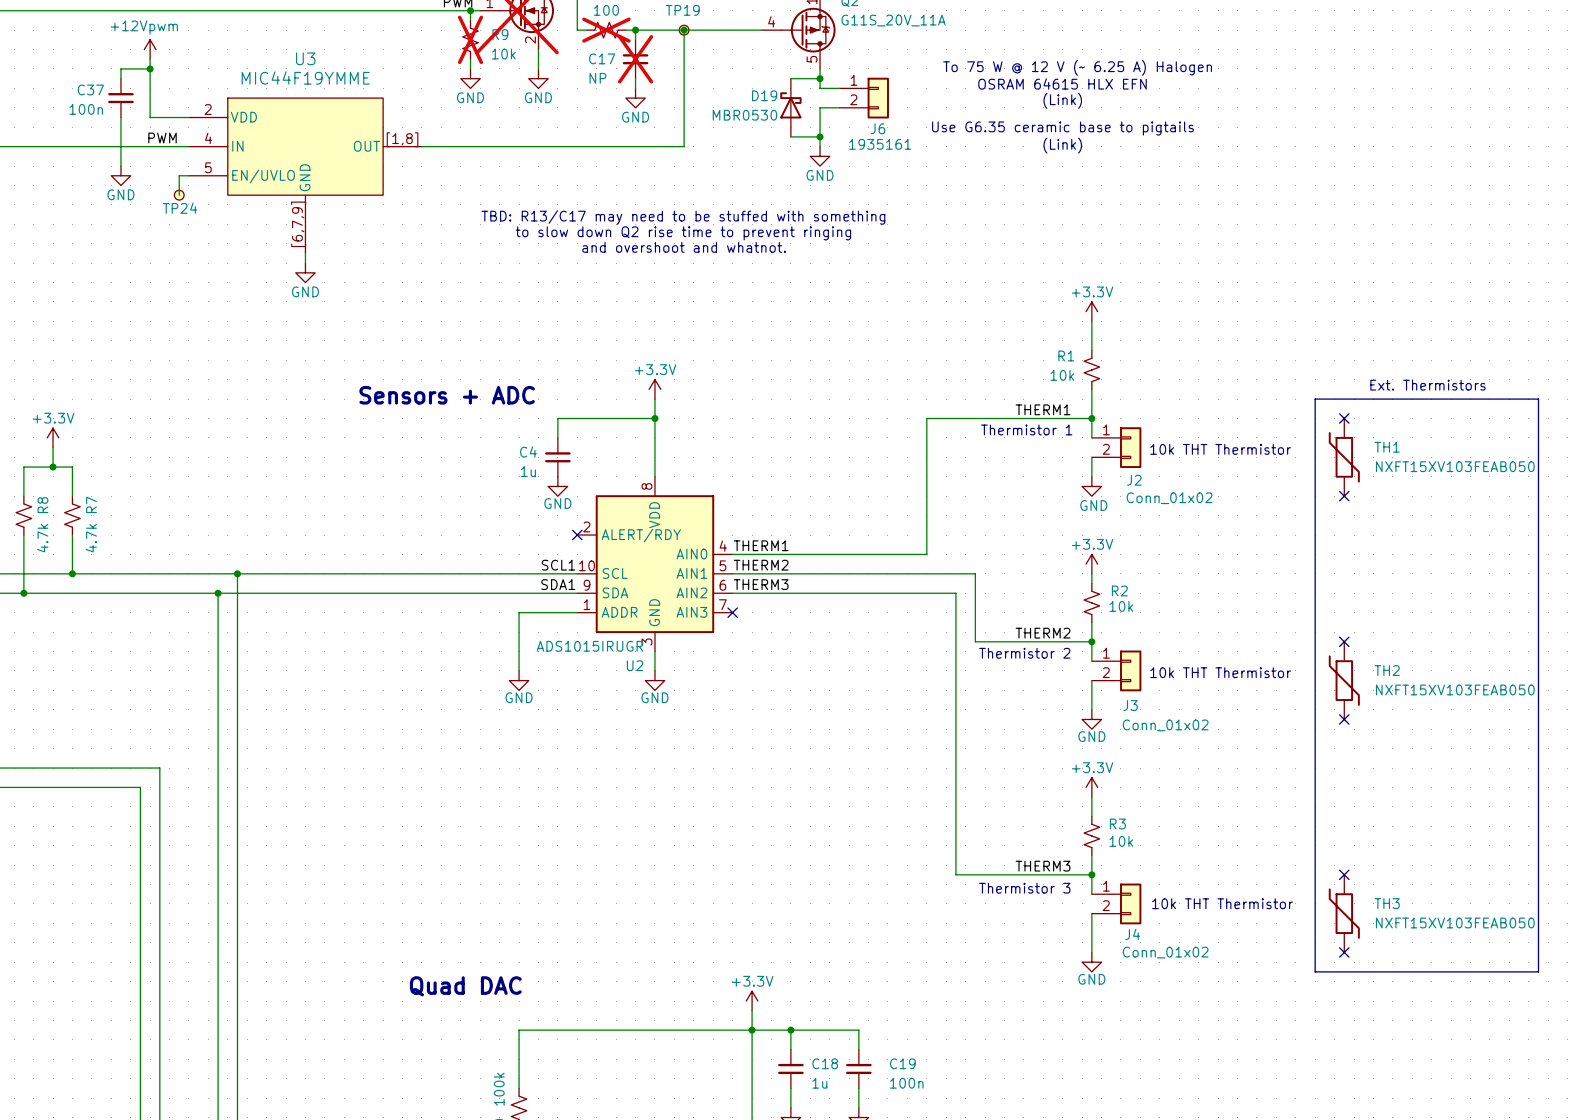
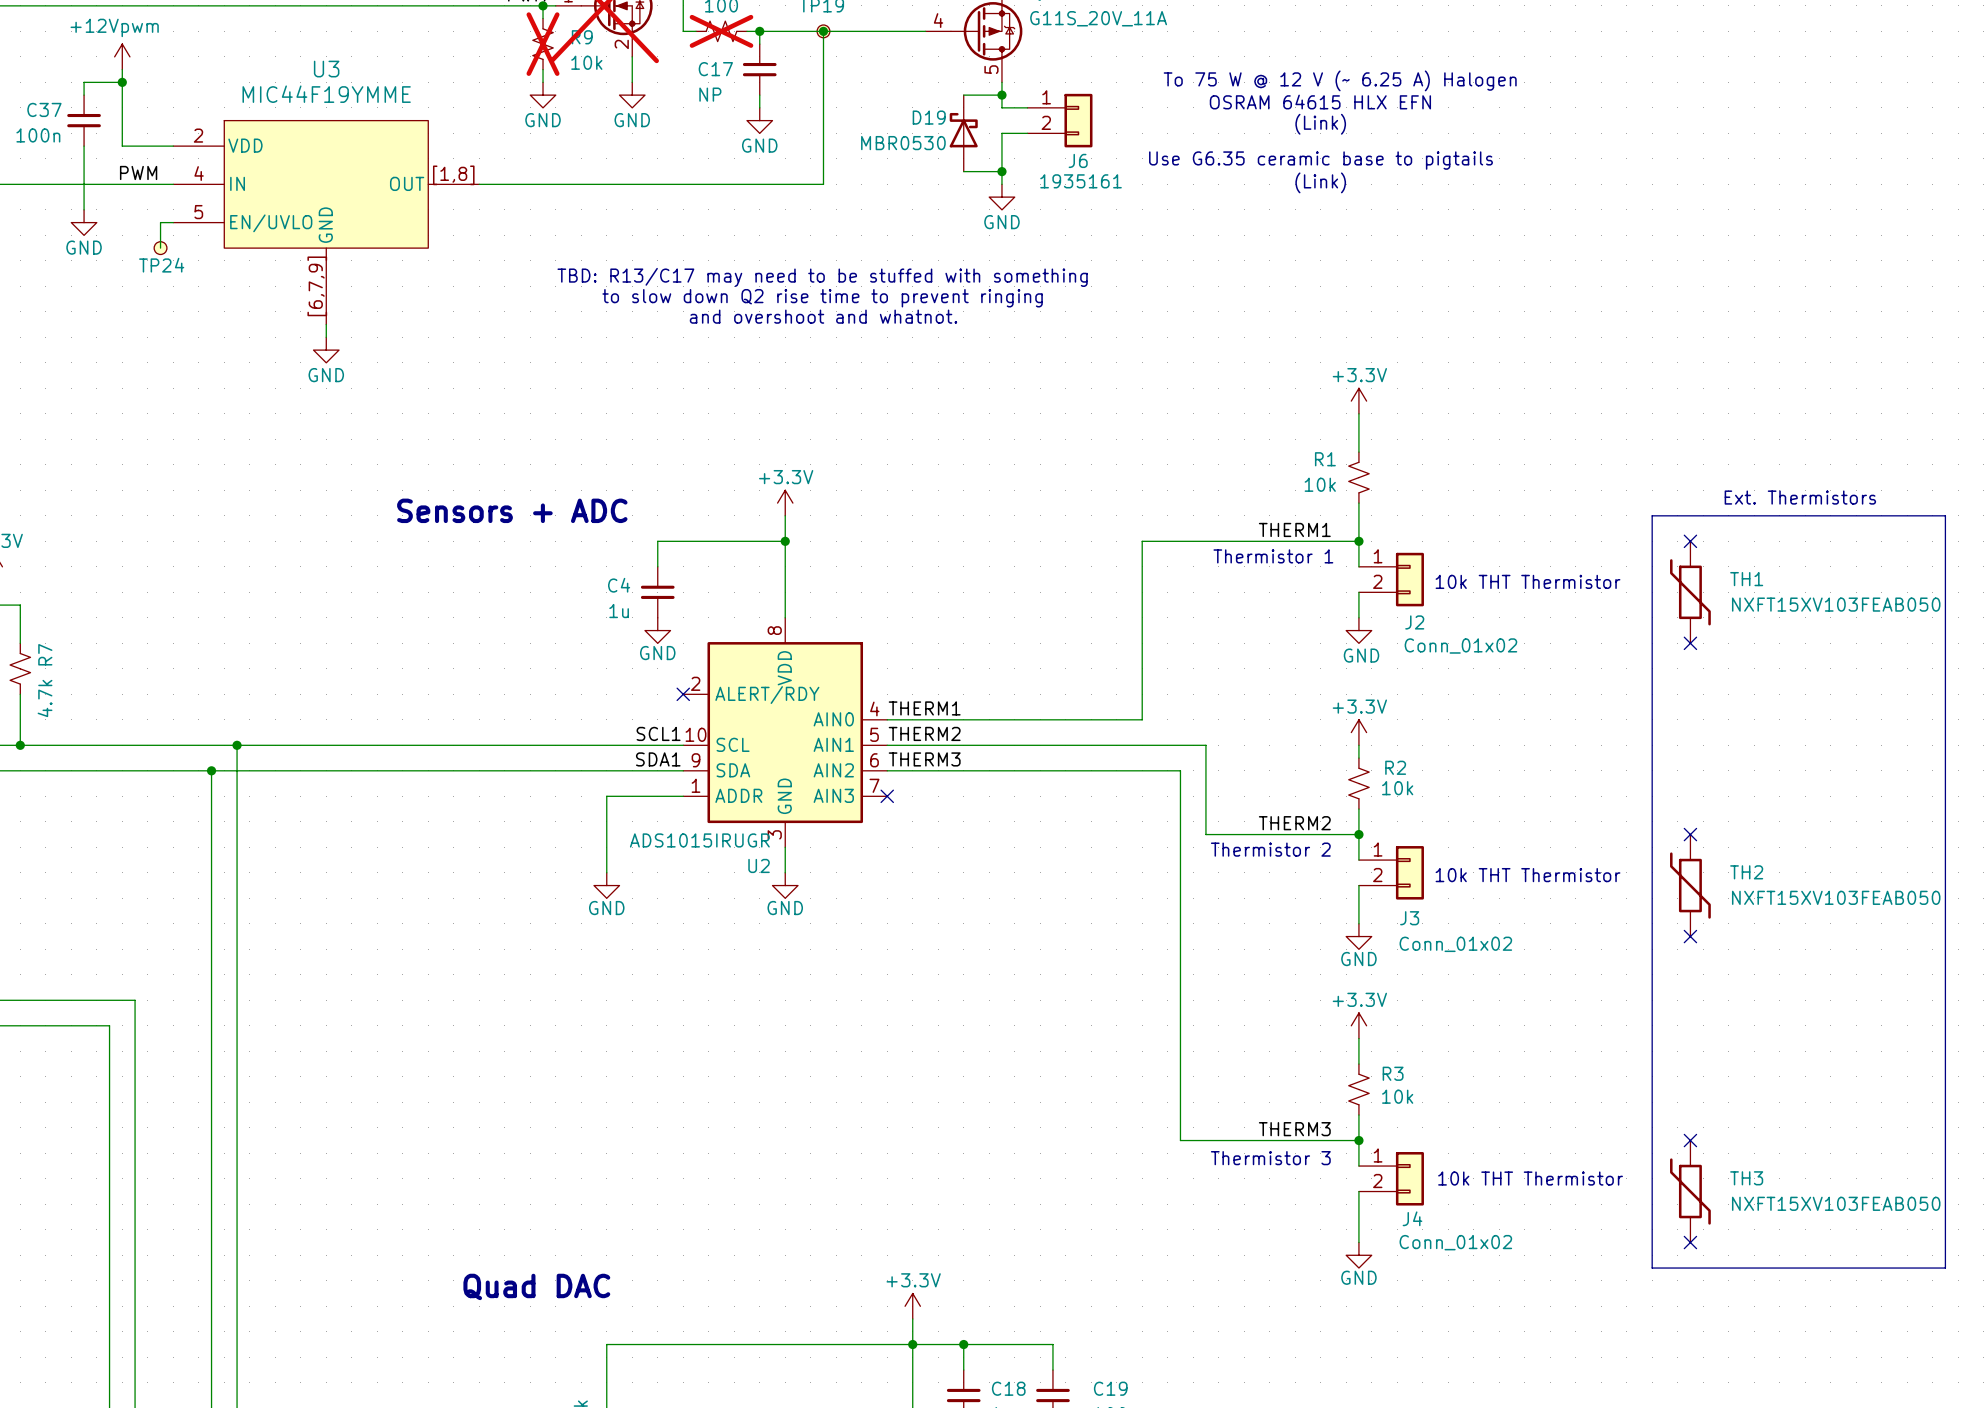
C17 do-not-place cross: (635, 59) -> none

